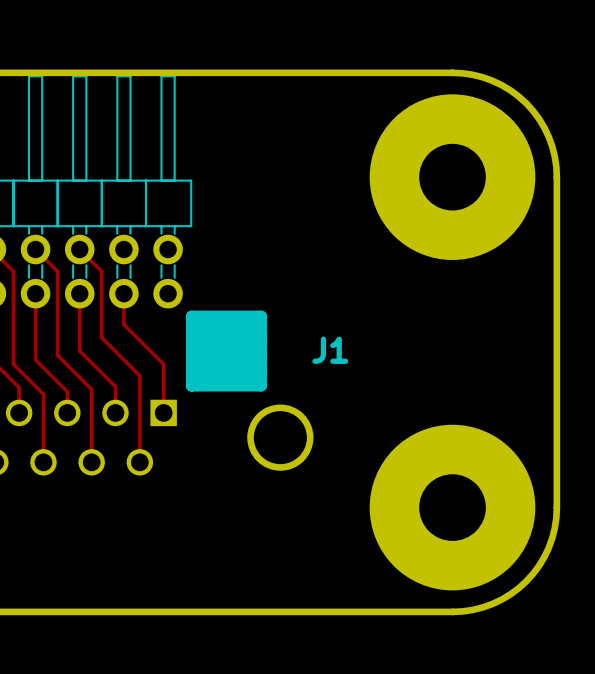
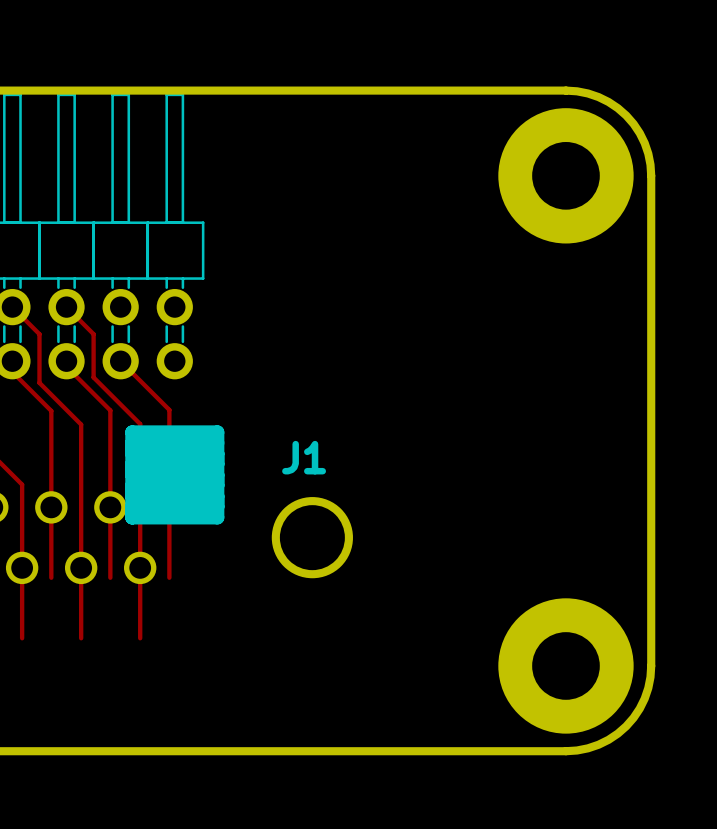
board edge: (452, 72) (472, 74) (492, 80) (510, 90) (526, 103) (539, 119) (548, 137) (554, 156) (556, 177) -> (523, 90) (565, 90) (588, 93) (608, 102) (626, 115) (639, 133) (648, 153) (651, 175) (651, 218)
part: none -> (565, 175)
part: (452, 177) -> none
track: (123, 293) (123, 324) (163, 364) -> (120, 361) (169, 409) (169, 447)
track: (79, 298) (79, 351) (115, 386) -> (66, 366) (110, 410) (110, 475)
track: (35, 302) (35, 359) (67, 391) -> (12, 372) (51, 410) (51, 481)
track: (101, 306) (101, 337) (139, 375) -> (93, 377) (140, 424) (140, 461)
track: (57, 311) (57, 355) (91, 389) -> (39, 382) (81, 424) (81, 478)
J1 name position: J1 (330, 350) -> J1 (304, 457)
drawing position: (226, 351) -> (174, 474)
track: none -> (51, 507) (51, 577)
track: none -> (110, 507) (110, 577)
track: none -> (169, 507) (169, 577)
track: none -> (22, 567) (22, 638)
track: none -> (81, 567) (81, 638)
track: none -> (140, 567) (140, 638)
part: (452, 507) -> none
board edge: (556, 507) (554, 527) (548, 547) (539, 565) (526, 581) (510, 594) (492, 603) (472, 609) (452, 611) -> (651, 623) (651, 665) (648, 688) (639, 708) (626, 726) (608, 739) (588, 748) (565, 751) (523, 751)
part: none -> (565, 665)

